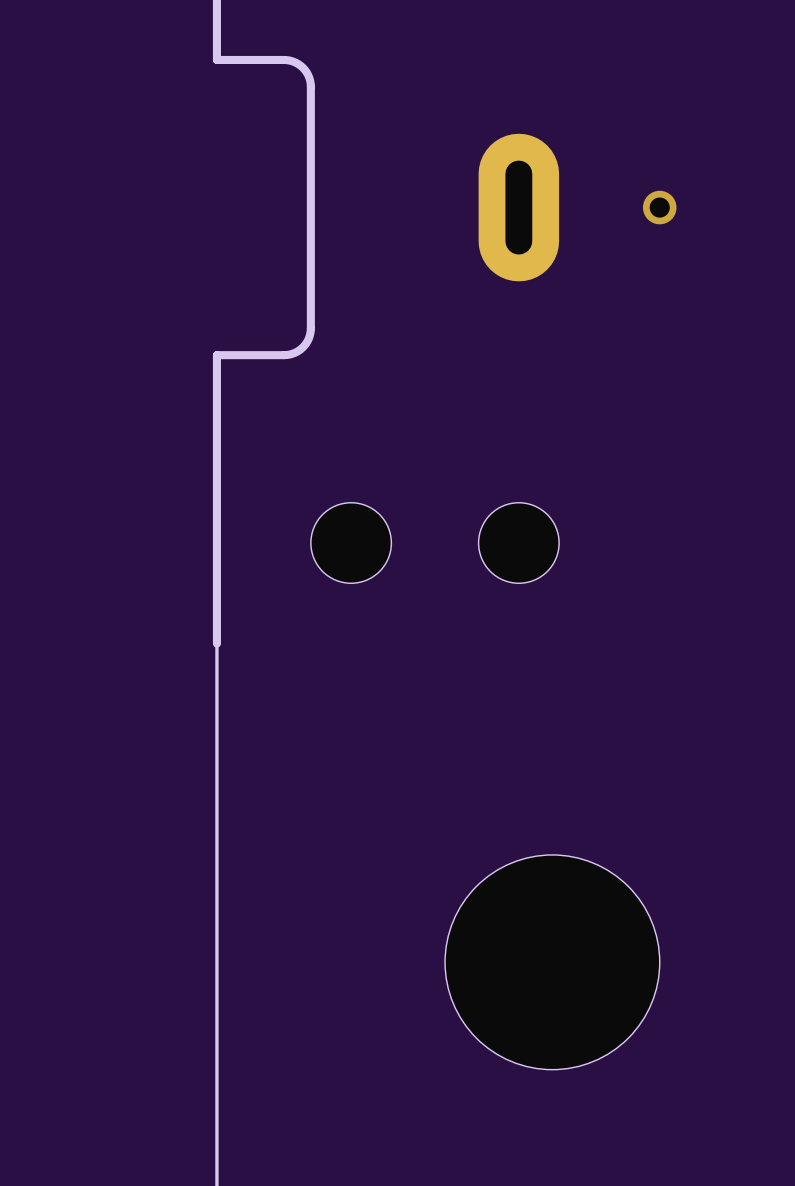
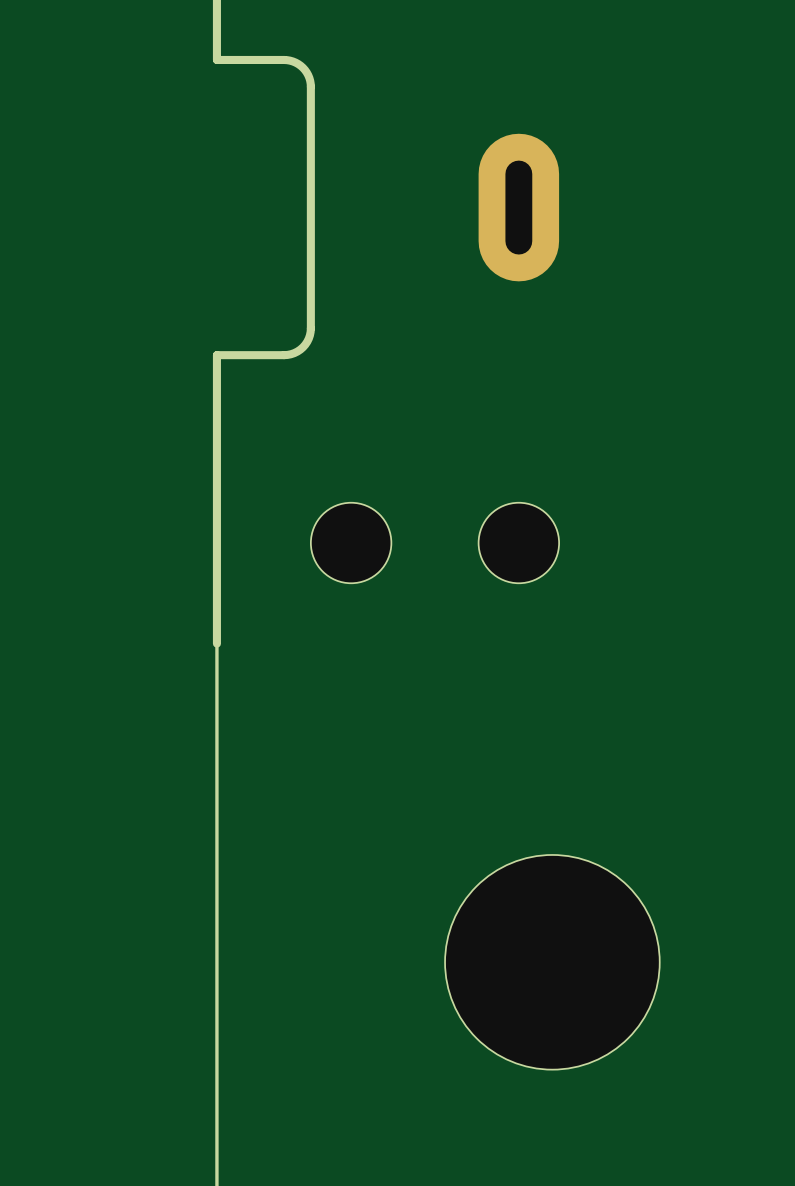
via: (659, 207) -> none

